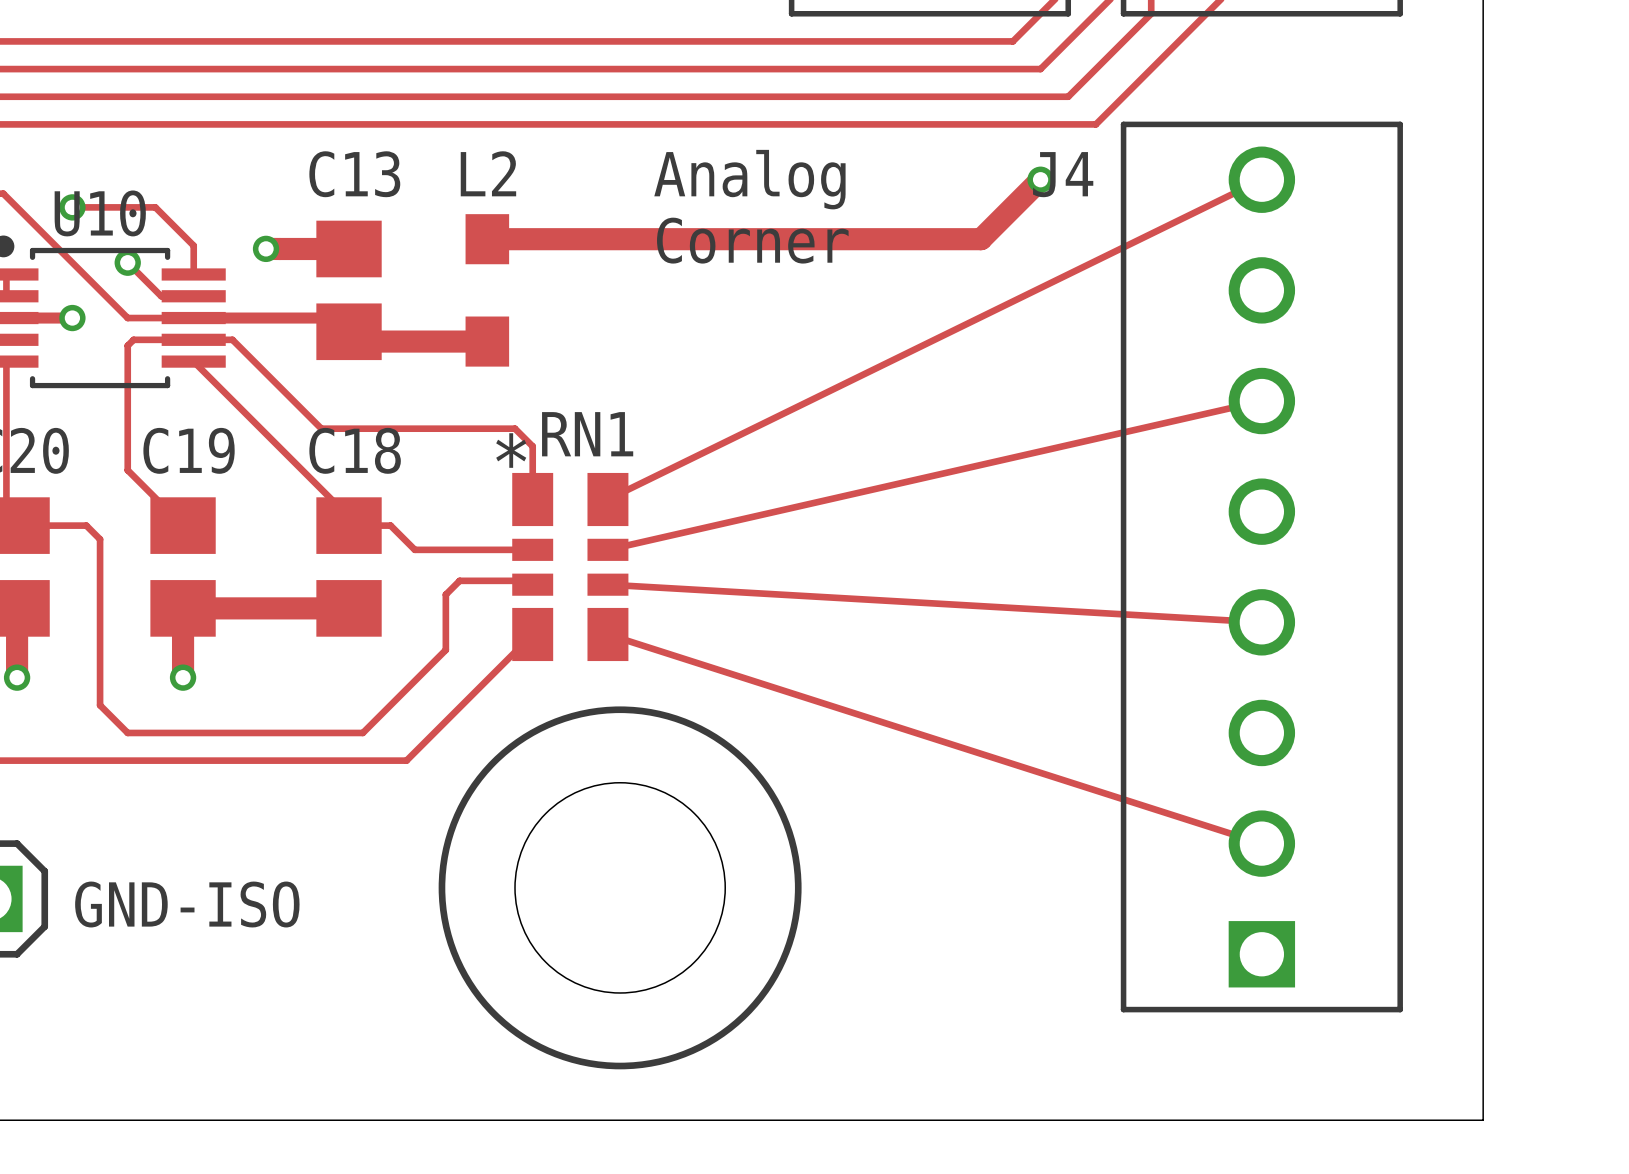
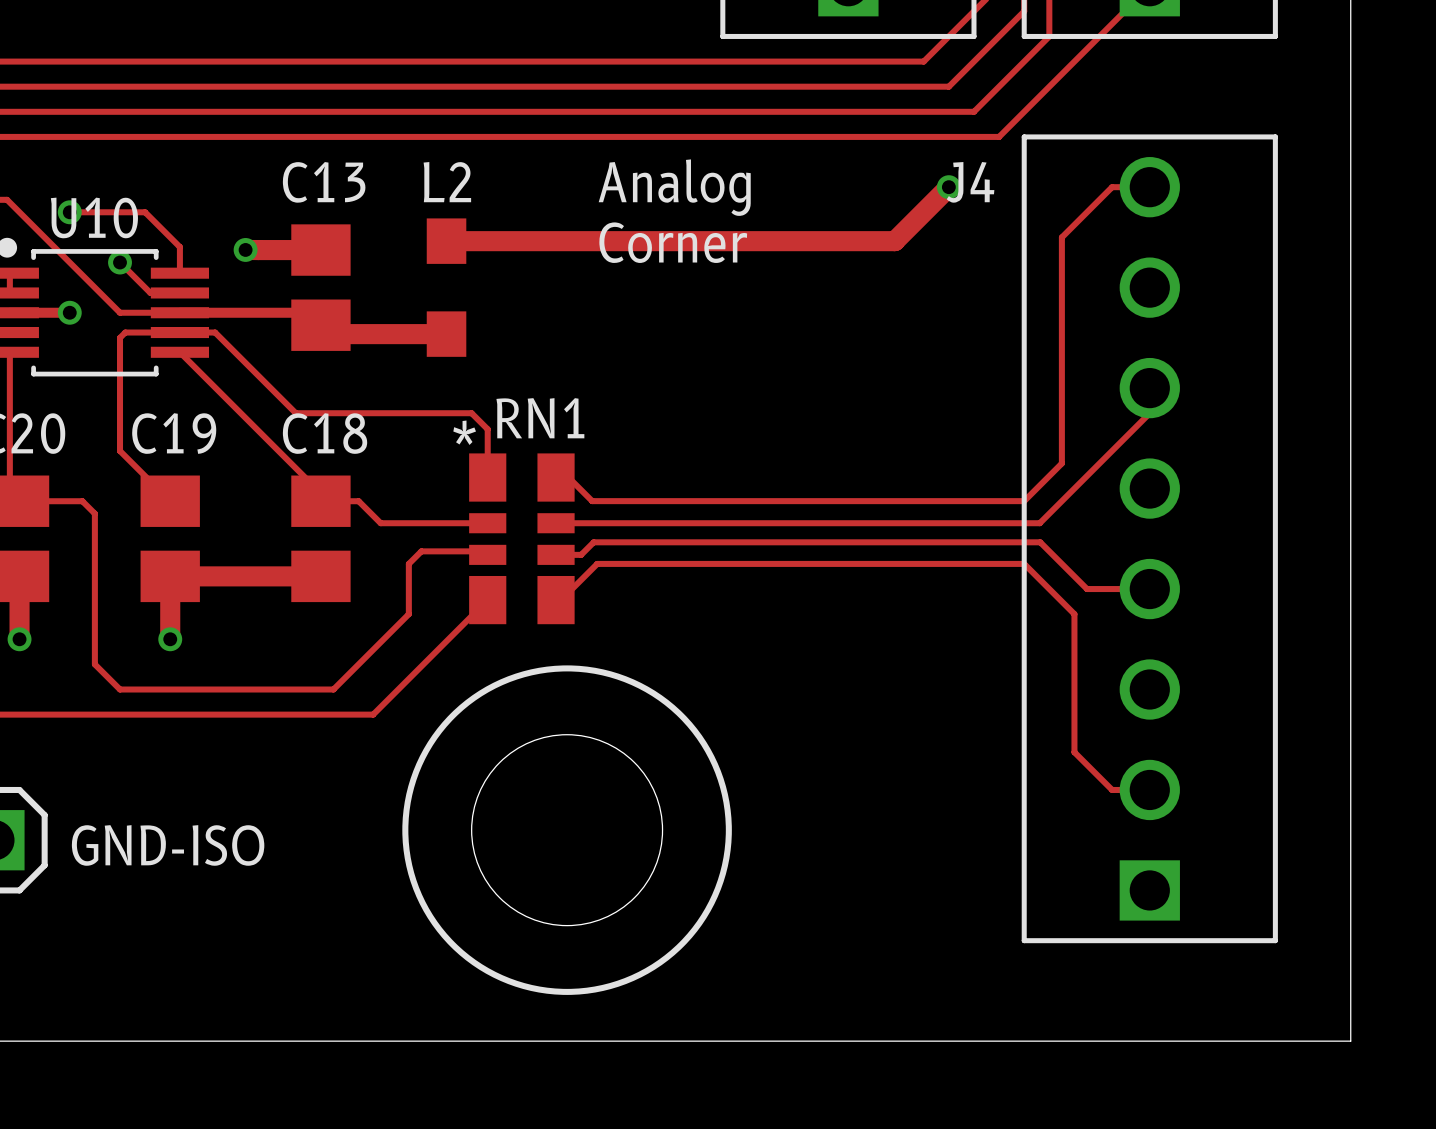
track: (1261, 179) (607, 499) -> (1149, 187) (1112, 187) (1061, 237) (1061, 463) (1024, 501) (592, 501) (568, 477) (556, 477)
track: (1261, 401) (607, 549) -> (1149, 388) (1149, 413) (1039, 523) (556, 523)
track: (607, 584) (1261, 622) -> (556, 554) (581, 554) (593, 542) (1040, 542) (1087, 589) (1149, 589)
track: (607, 634) (1261, 843) -> (556, 600) (561, 600) (597, 563) (1024, 563) (1074, 614) (1074, 752) (1112, 789) (1149, 789)

